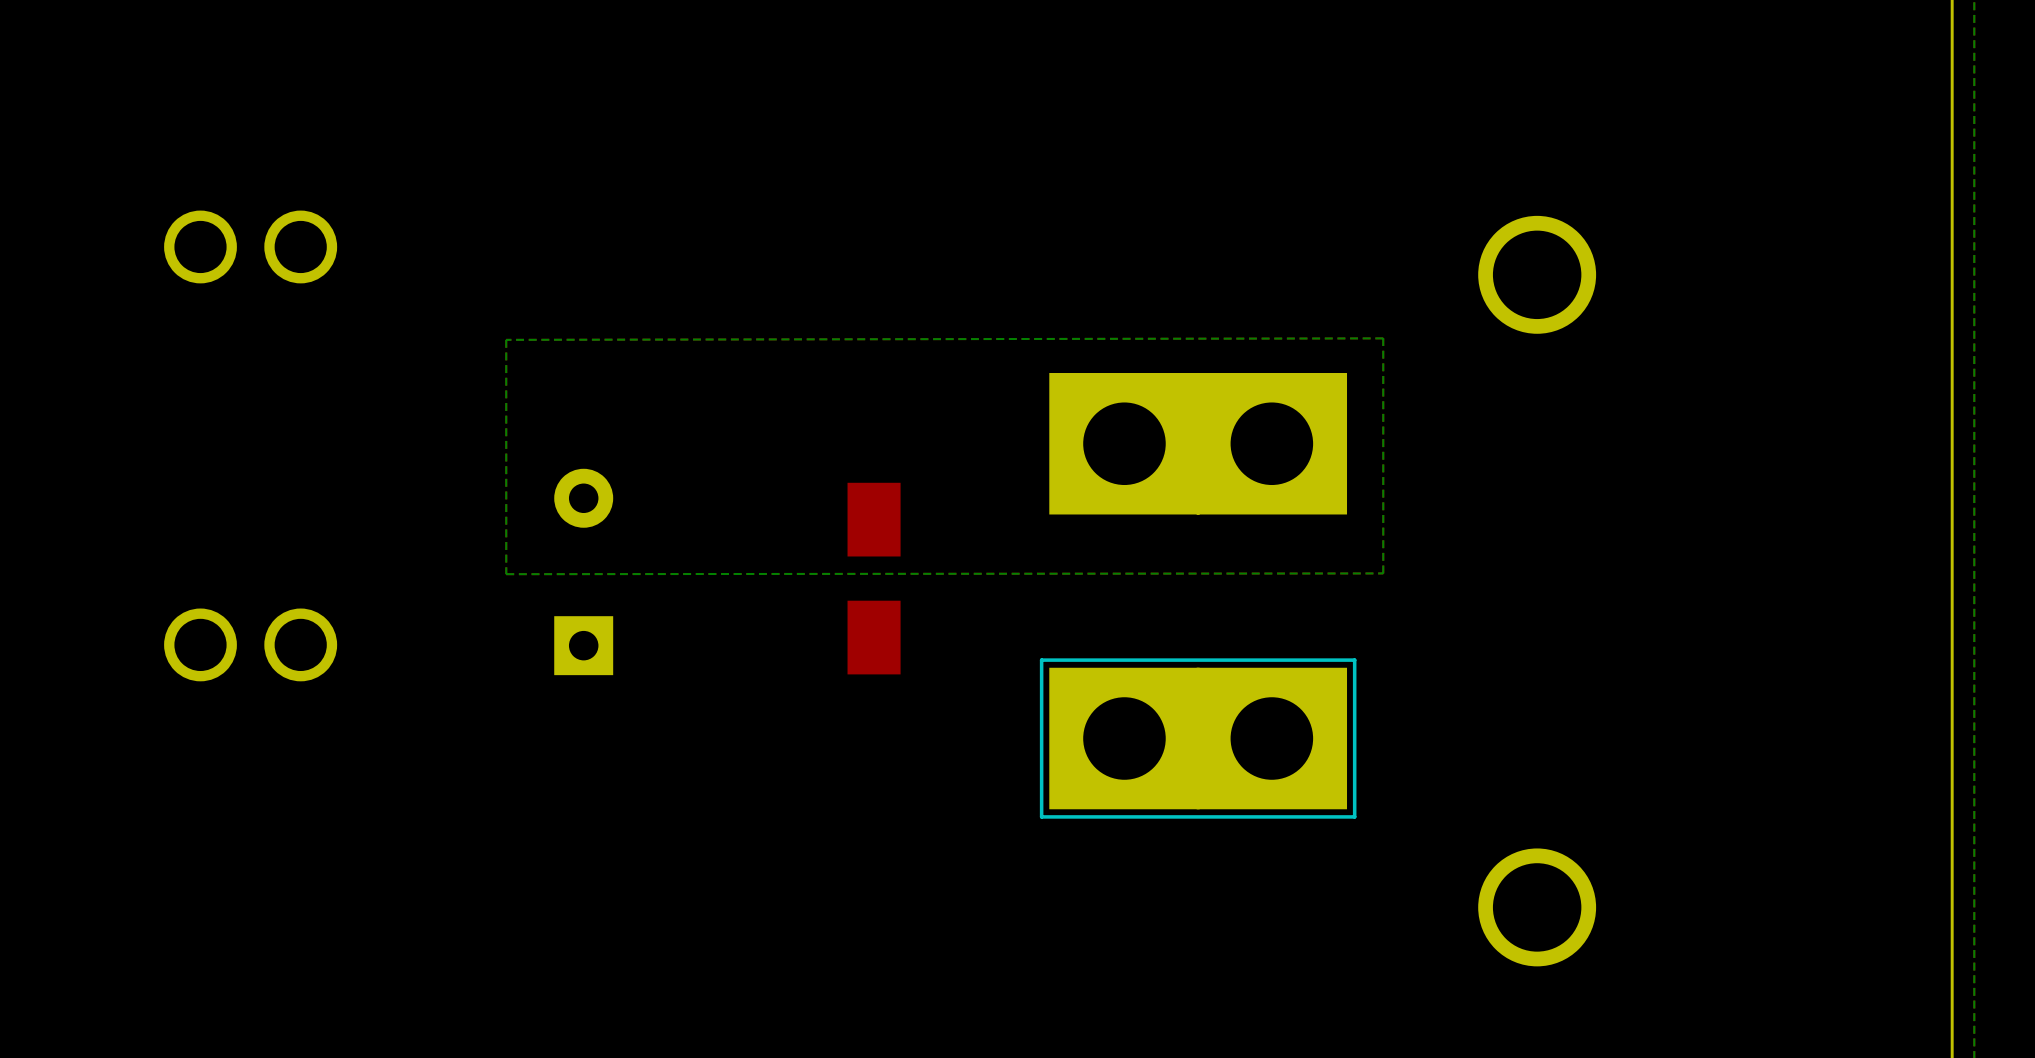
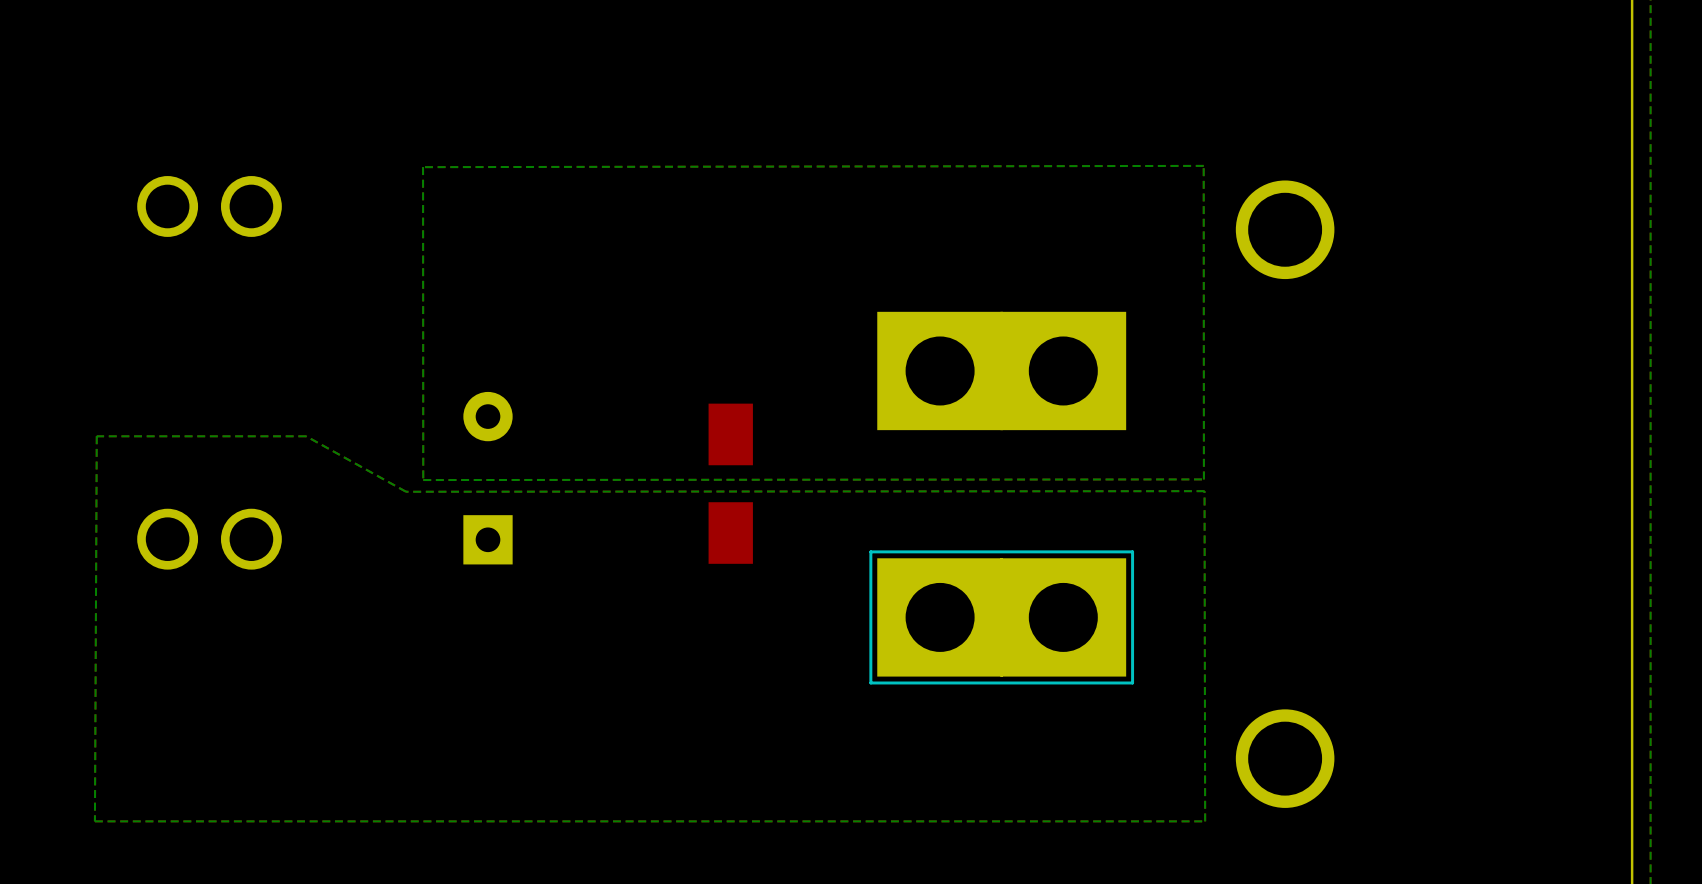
bottom zone outline: (1383, 338) (1383, 573) (506, 574) (506, 339) (1383, 338) -> (1203, 165) (1203, 479) (423, 480) (423, 167) (1203, 165)
bottom zone outline: none -> (306, 436) (406, 491) (1204, 491) (1205, 821) (94, 821) (96, 436) (306, 436)

